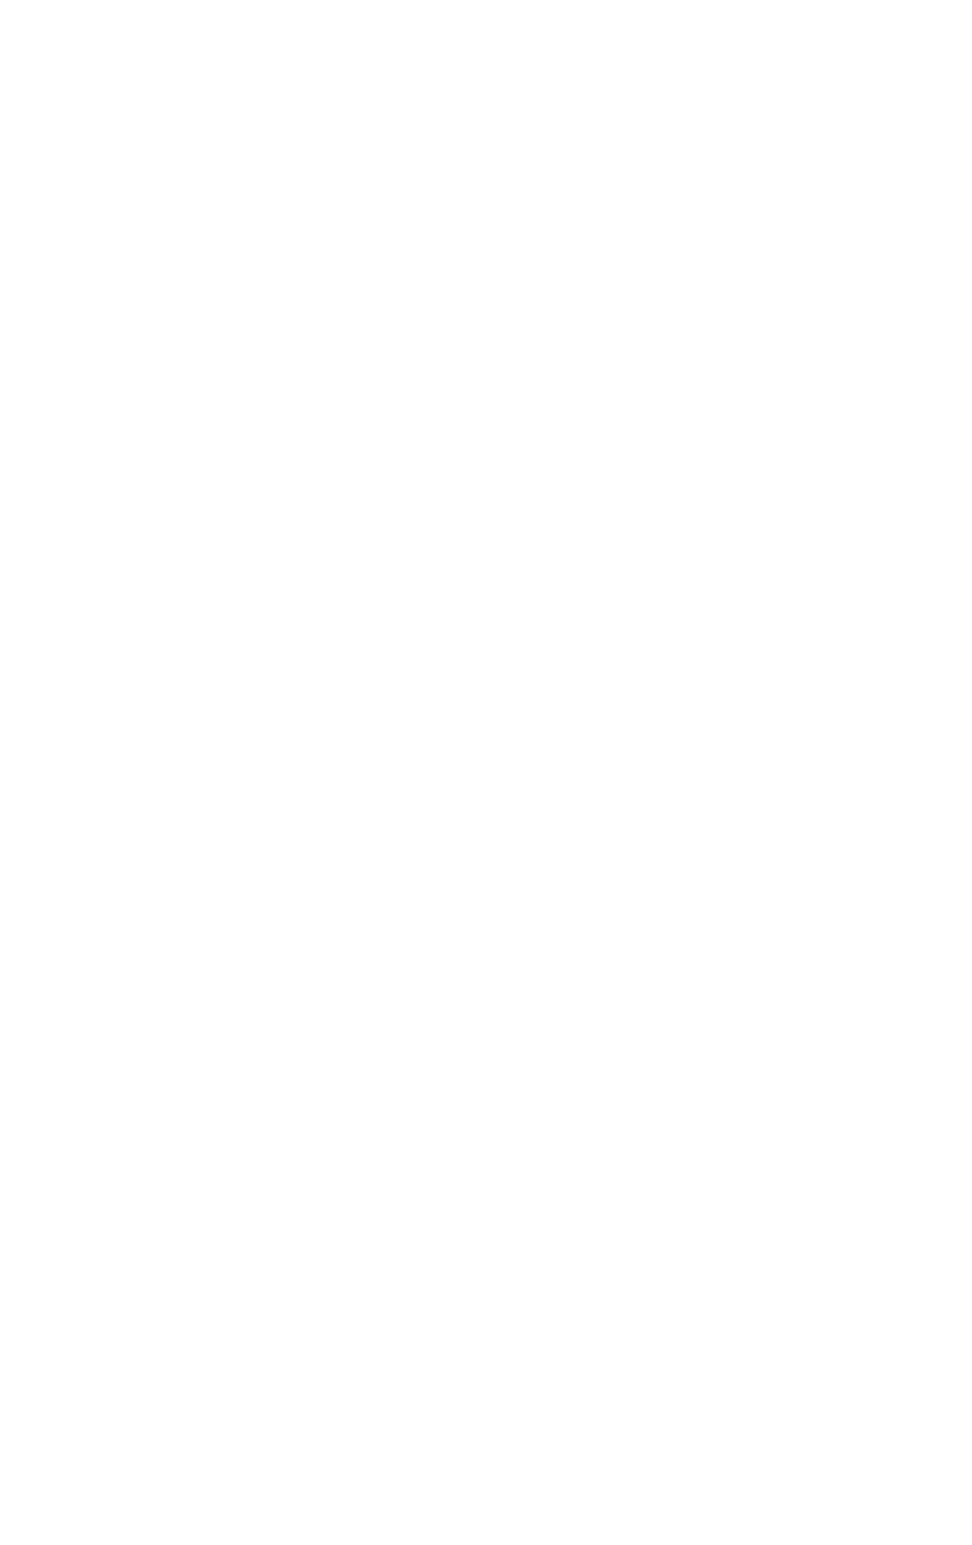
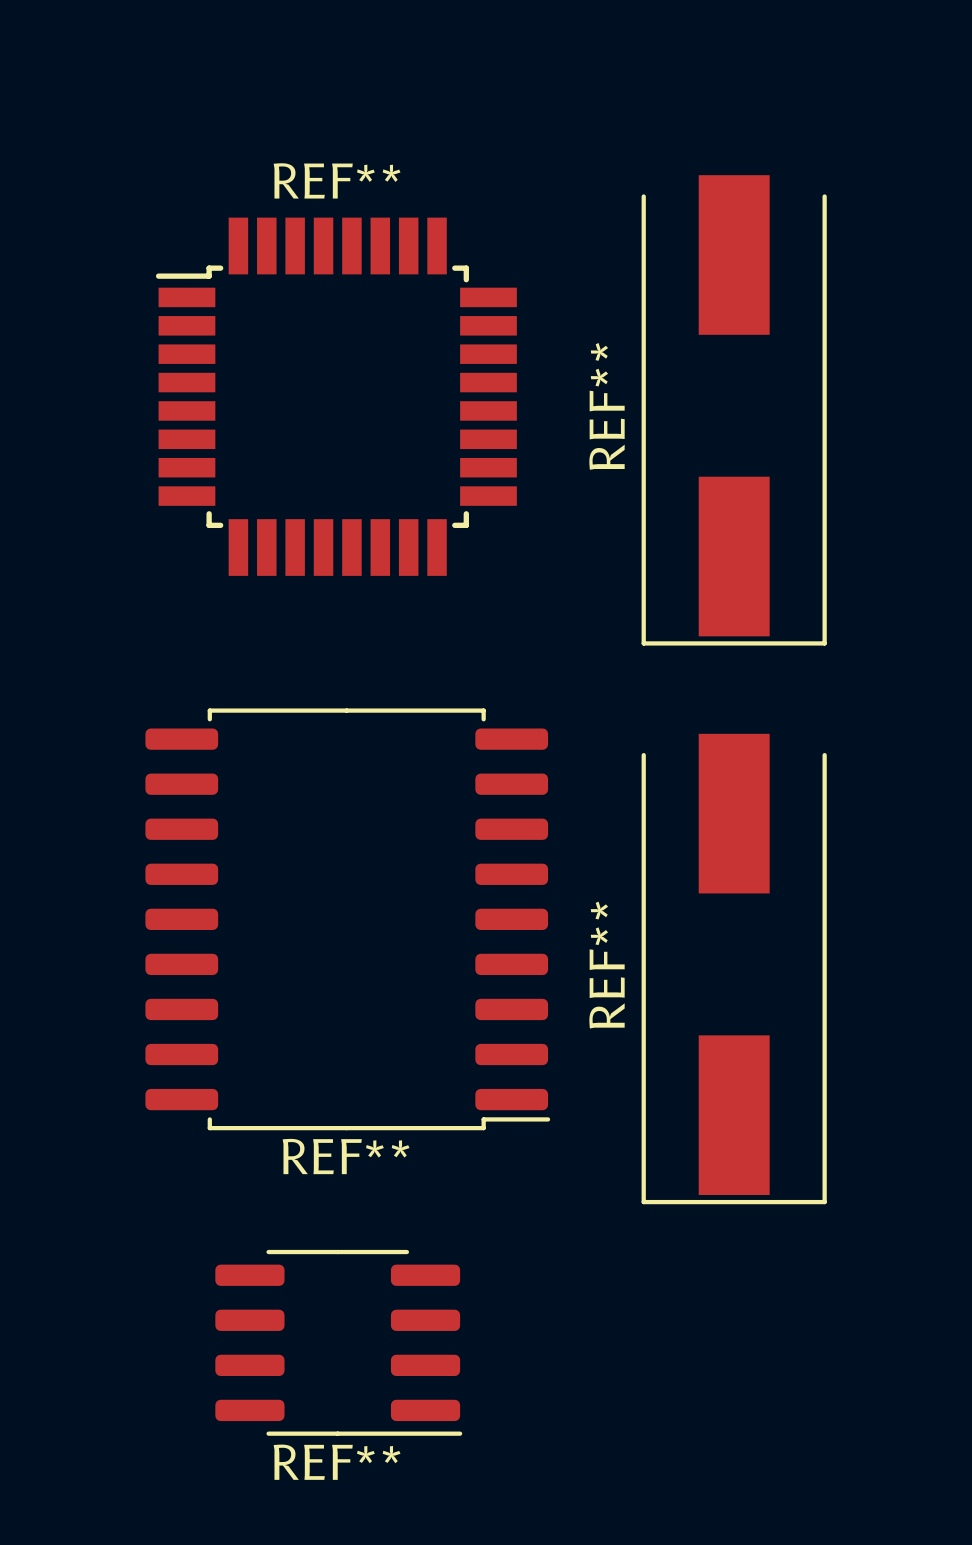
REF**: none -> (336, 396)
REF**: none -> (734, 410)
REF**: none -> (347, 919)
REF**: none -> (734, 969)
REF**: none -> (338, 1342)

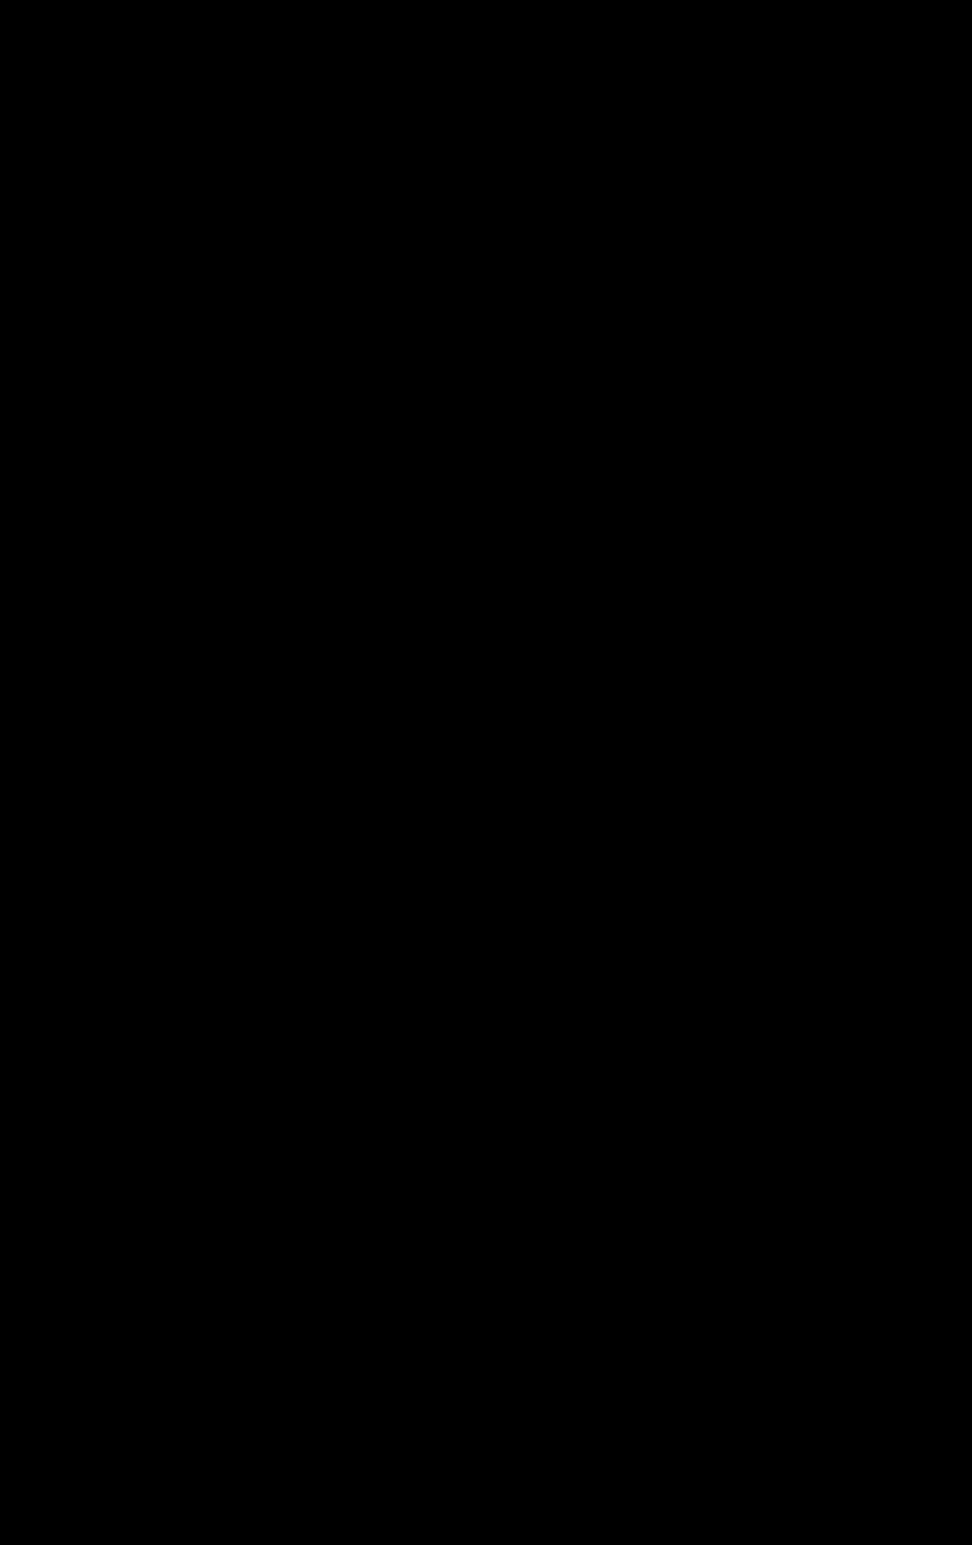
REF**: (336, 396) -> none
REF**: (734, 410) -> none
REF**: (347, 919) -> none
REF**: (734, 969) -> none
REF**: (338, 1342) -> none

